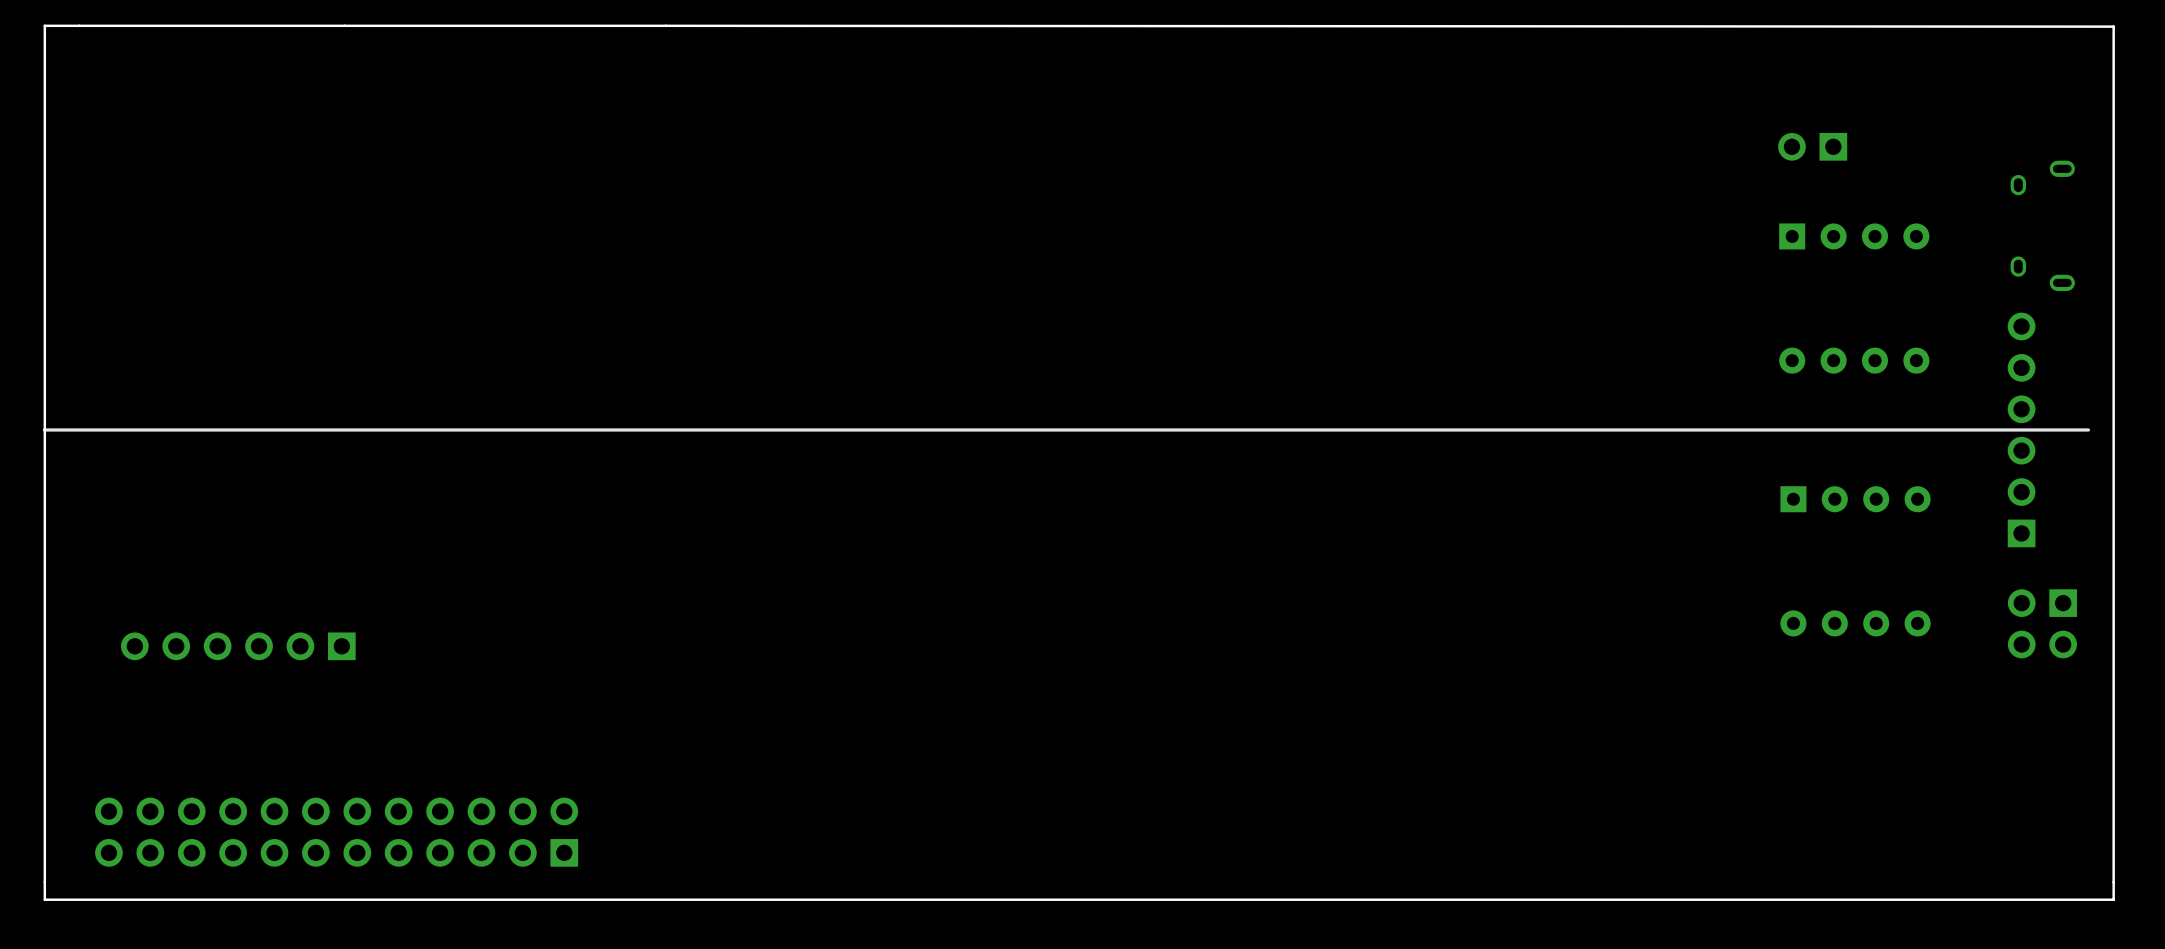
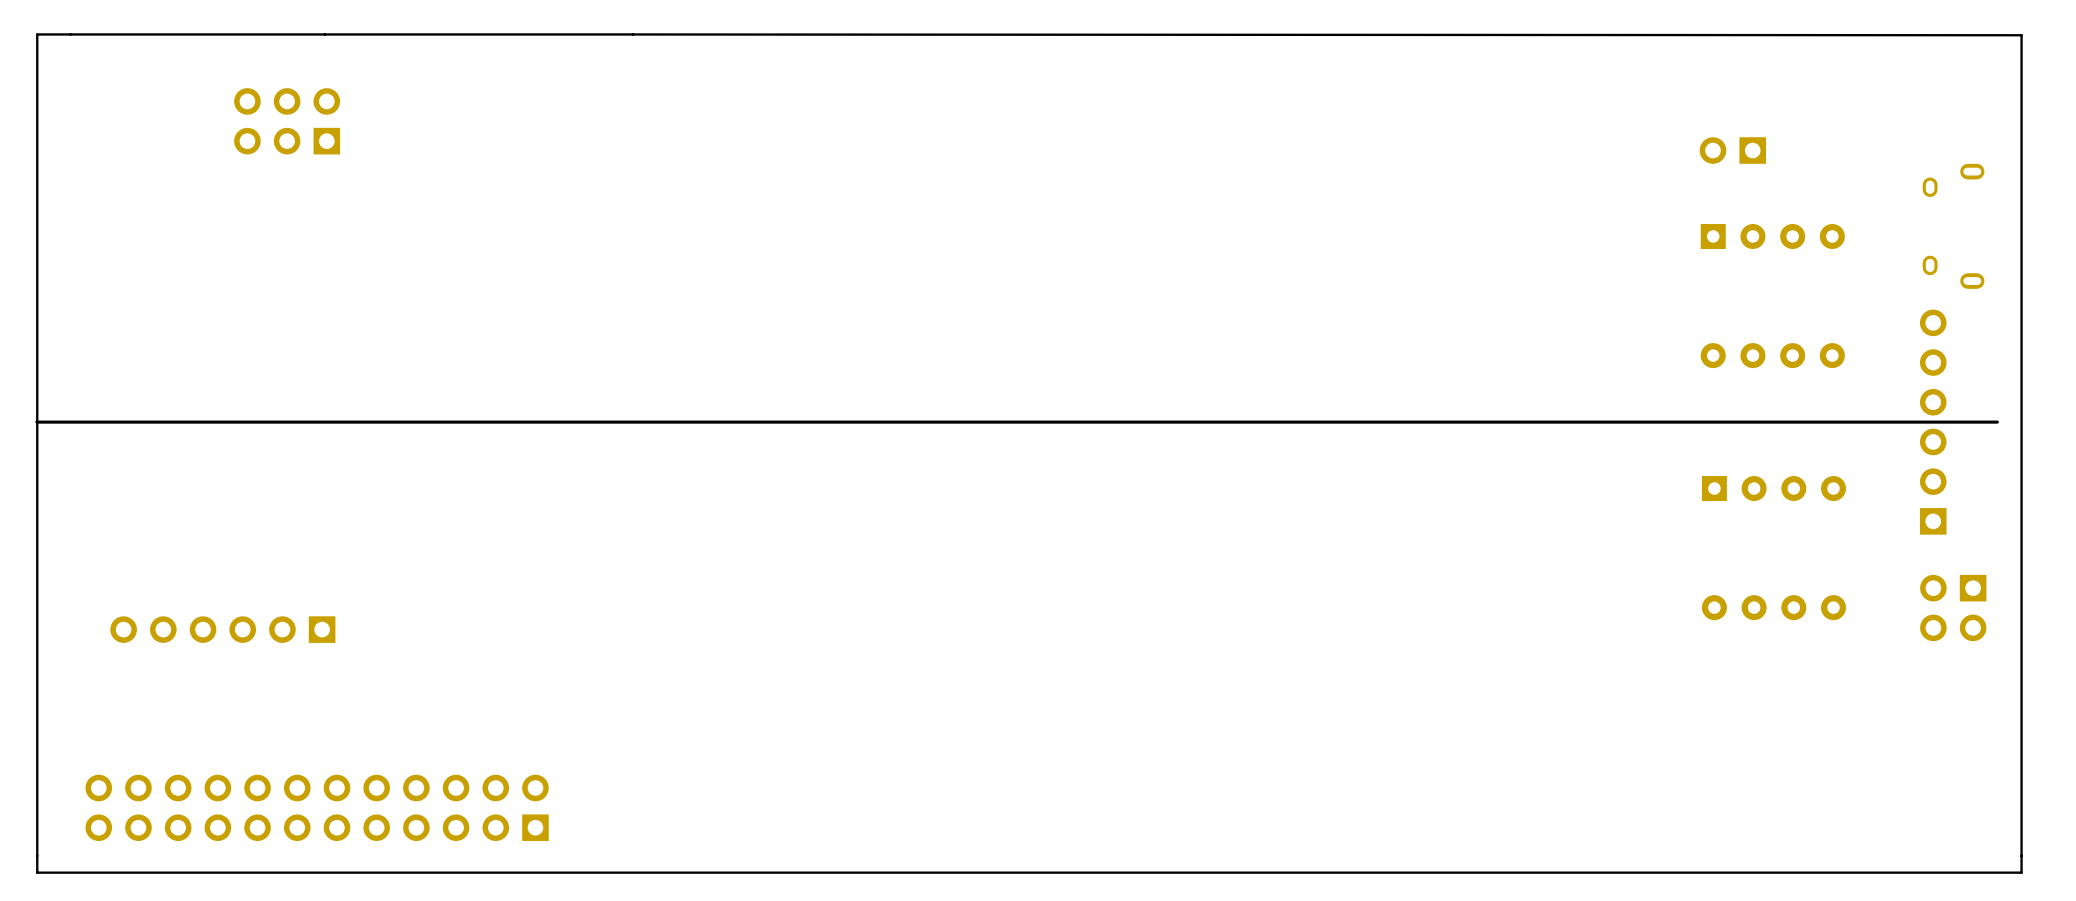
part: none -> (287, 121)

